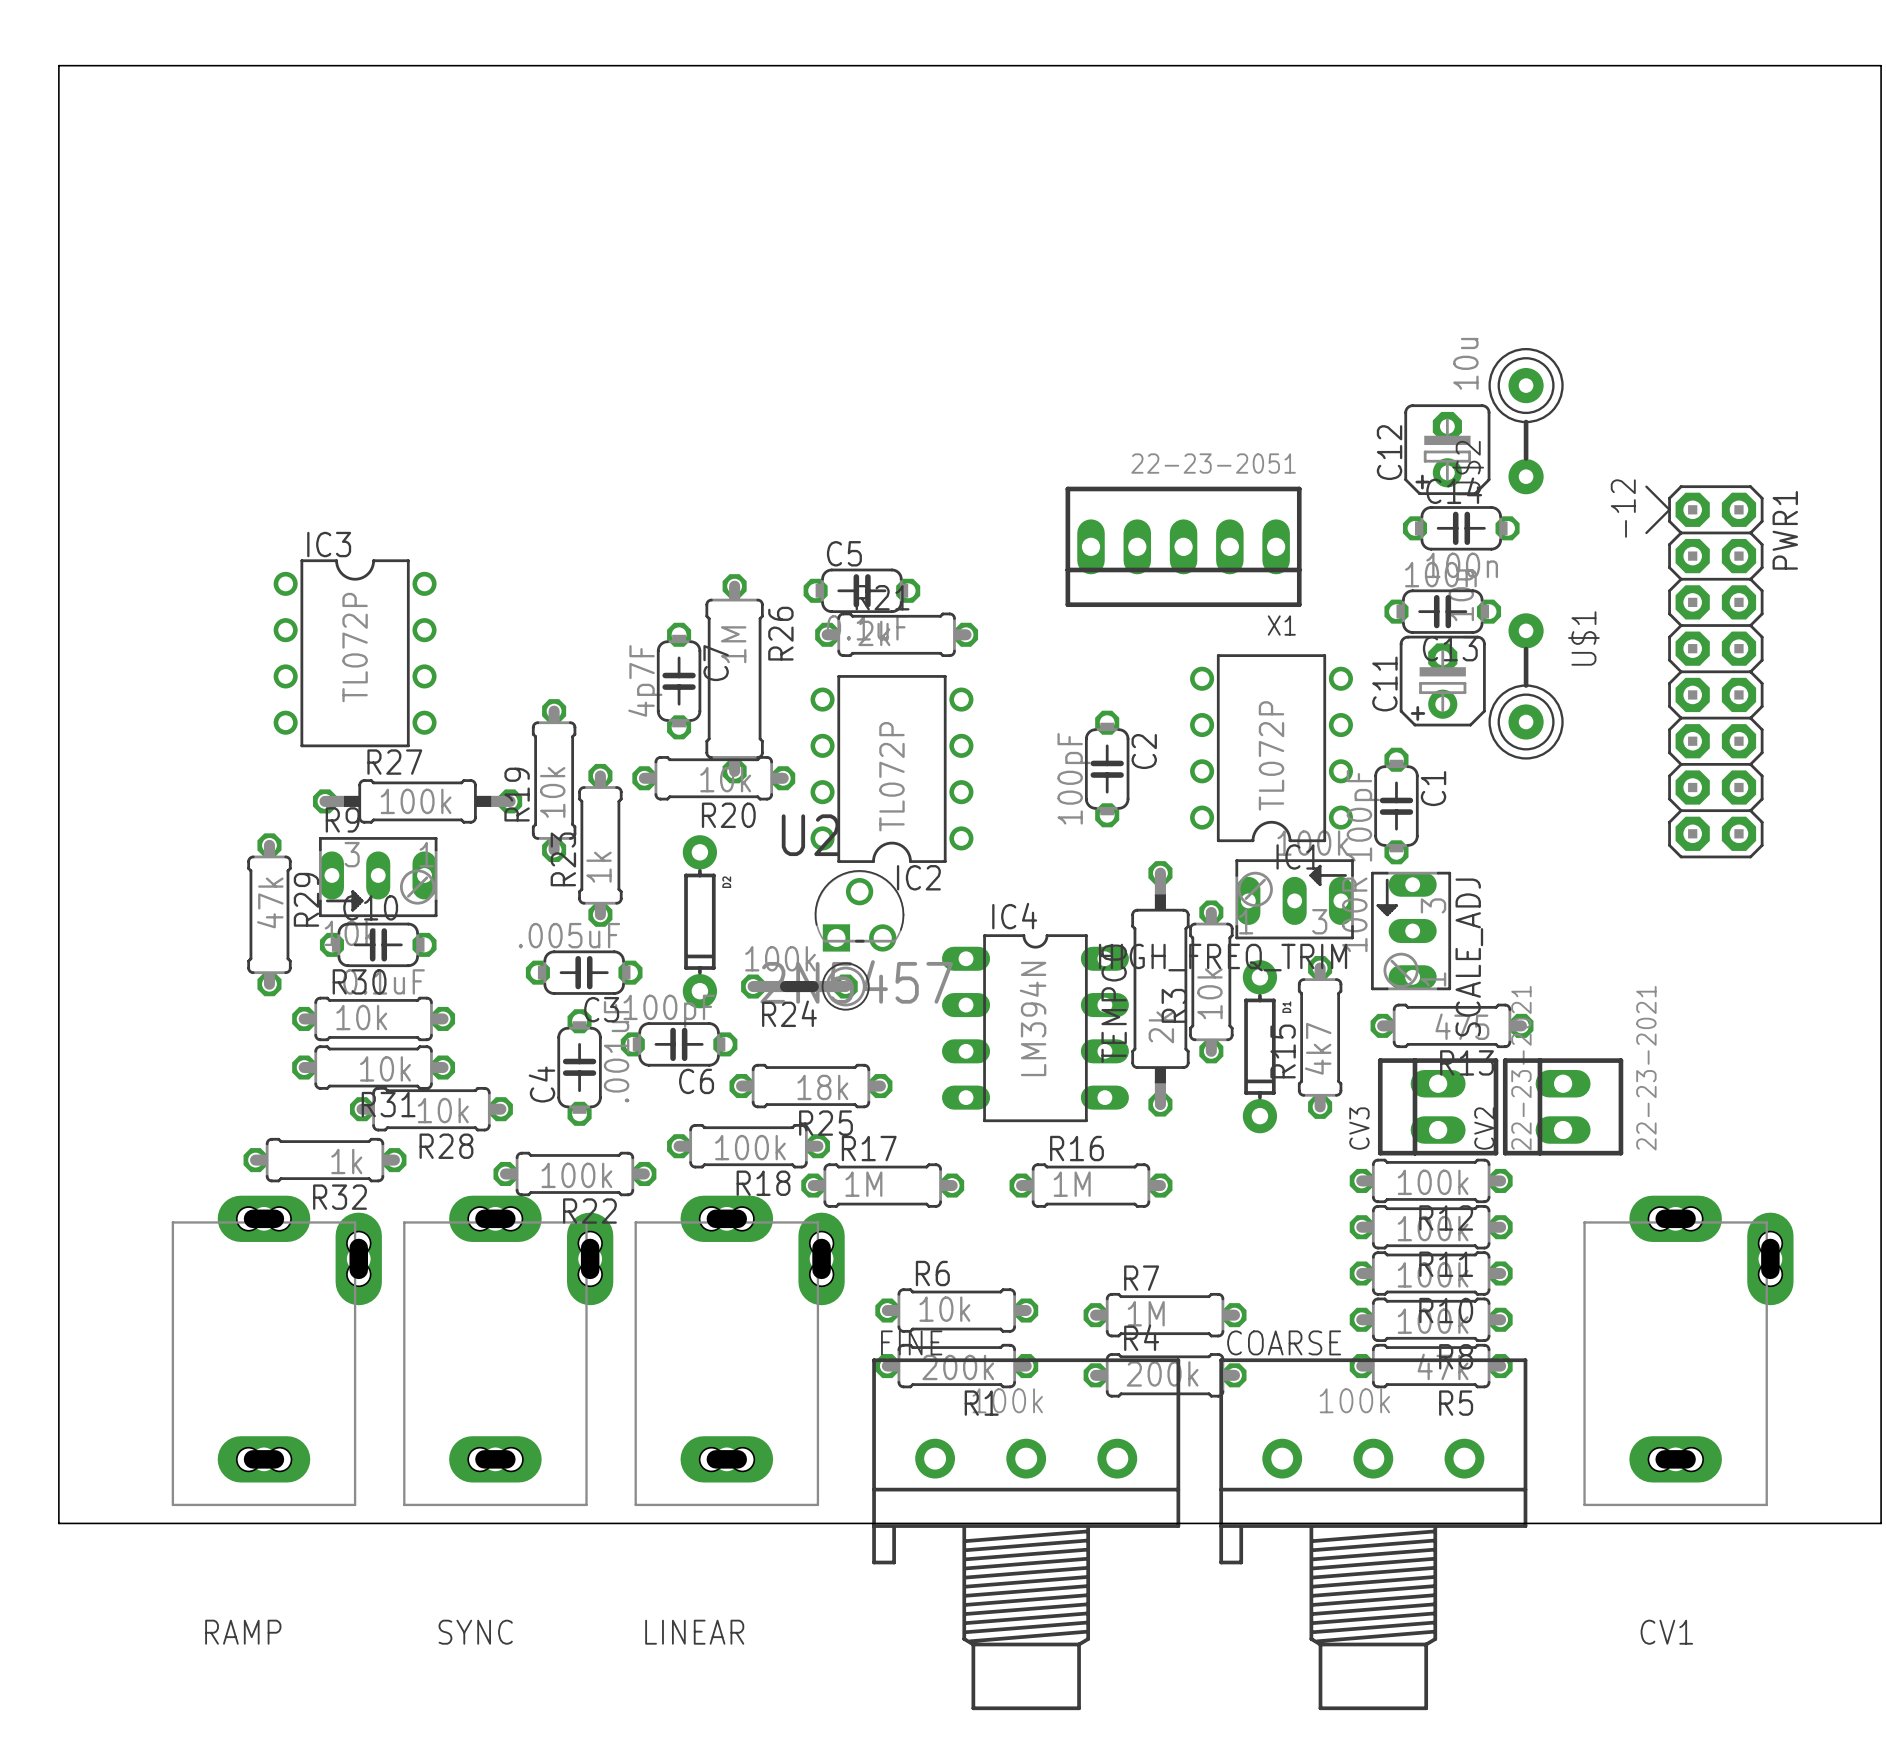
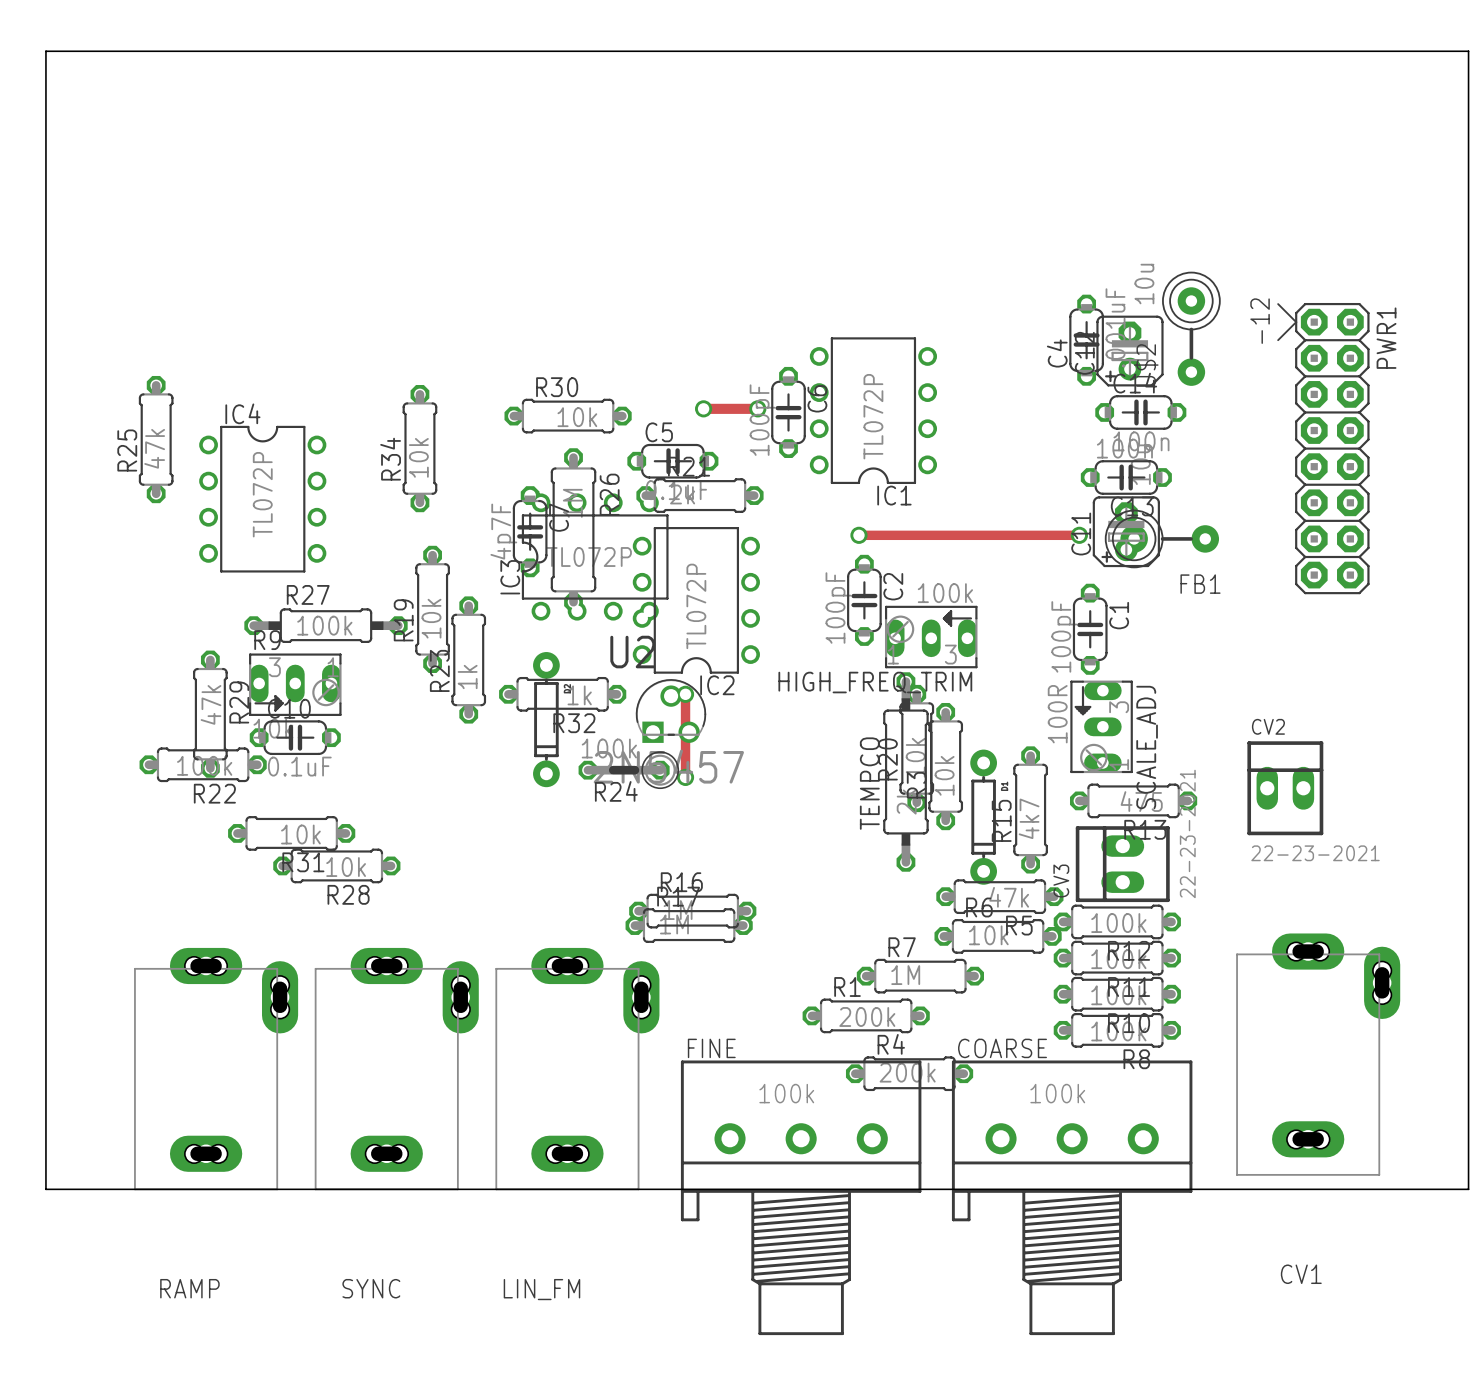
track: none -> (703, 408) (757, 408)
via: none -> (703, 408)
via: none -> (757, 408)
X1: 22-23-2051 (1183, 546) -> none
R34: none -> 10k (419, 448)
IC3 rotation: 0° (355, 653) -> 90° counterclockwise (595, 557)
IC3 position: (355, 653) -> (595, 557)
PWR1 position: (1704, 671) -> (1323, 448)
track: none -> (858, 535) (1079, 535)
via: none -> (858, 535)
via: none -> (1079, 535)
U$1: (1526, 686) -> none
FB1: none -> (1161, 538)
IC1 position: (1271, 748) -> (873, 410)
R20 rotation: 0° (713, 778) -> 90° clockwise (916, 748)
R20 position: (713, 778) -> (916, 748)
track: none -> (685, 694) (685, 777)
via: none -> (685, 694)
HIGH_FREQ_TRIM position: (1294, 899) -> (931, 637)
IC4 footprint: [941, 934, 1129, 1123] -> [199, 425, 327, 573]
C3: .005uF (584, 972) -> none
via: none -> (685, 777)
R30 value position: 10k (361, 1017) -> 10k (577, 417)
R30 position: (373, 1018) -> (568, 416)
IC4 value: LM394N (1033, 1018) -> TL072P (262, 494)
C6 rotation: 0° (679, 1044) -> 90° counterclockwise (788, 412)
C6 position: (679, 1044) -> (788, 412)
C4 position: (579, 1067) -> (1086, 340)
R25 rotation: 0° (810, 1086) -> 90° clockwise (156, 439)
R25 position: (810, 1086) -> (156, 439)
R25 value: 18k (822, 1087) -> 47k (154, 448)
CV2 rotation: 0° (1563, 1106) -> 90° clockwise (1285, 788)
CV2 position: (1563, 1106) -> (1285, 788)
R18: 100k (748, 1146) -> none
R32 position: (325, 1160) -> (562, 694)
R22 position: (574, 1173) -> (203, 764)
R16 position: (1091, 1185) -> (692, 911)
R6 position: (956, 1310) -> (998, 936)
R7 position: (1165, 1315) -> (920, 976)
RAMP position: (276, 1350) -> (216, 1069)
SYNC position: (508, 1350) -> (396, 1069)
LINEAR: (739, 1350) -> none
R1 position: (956, 1366) -> (866, 1015)
R5 position: (1431, 1366) -> (999, 896)
LIN_FM: none -> (577, 1069)
R1 name position: R1 (981, 1403) -> R1 (847, 986)

